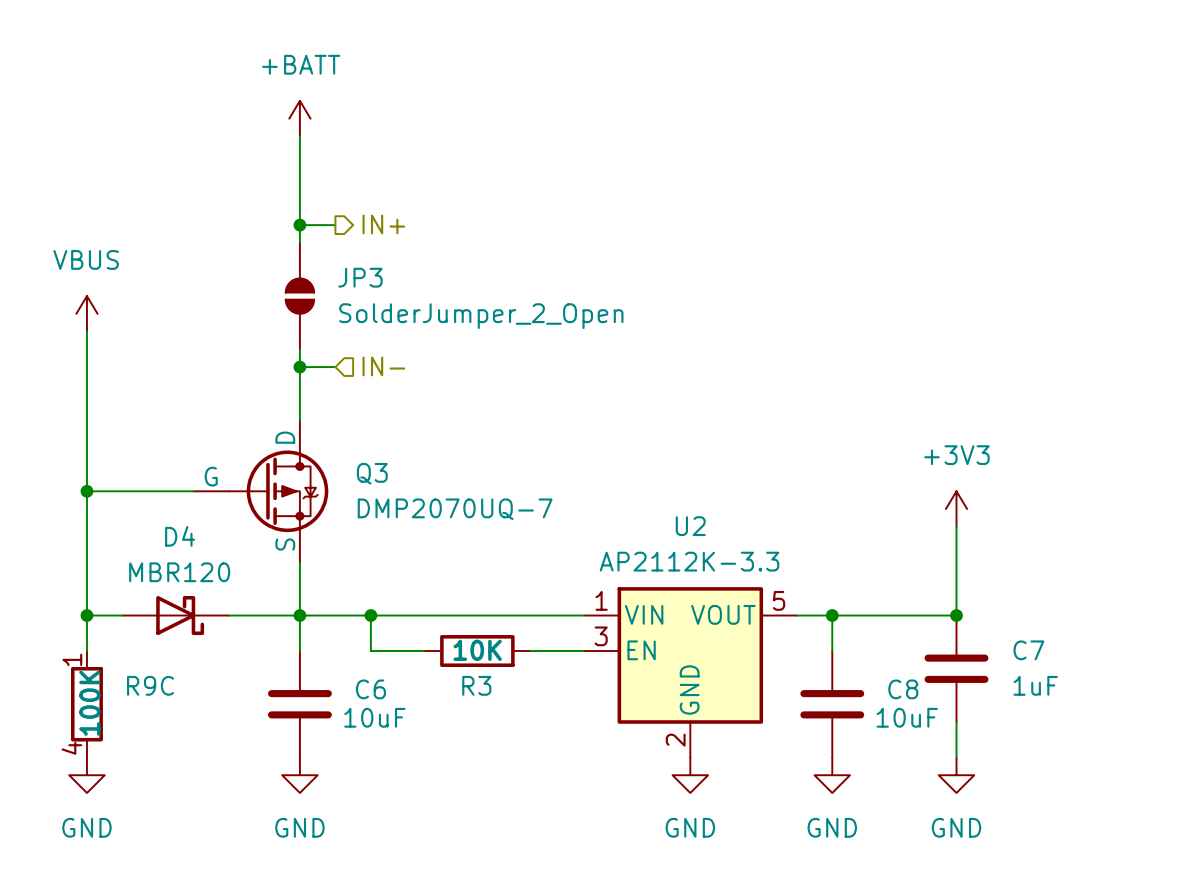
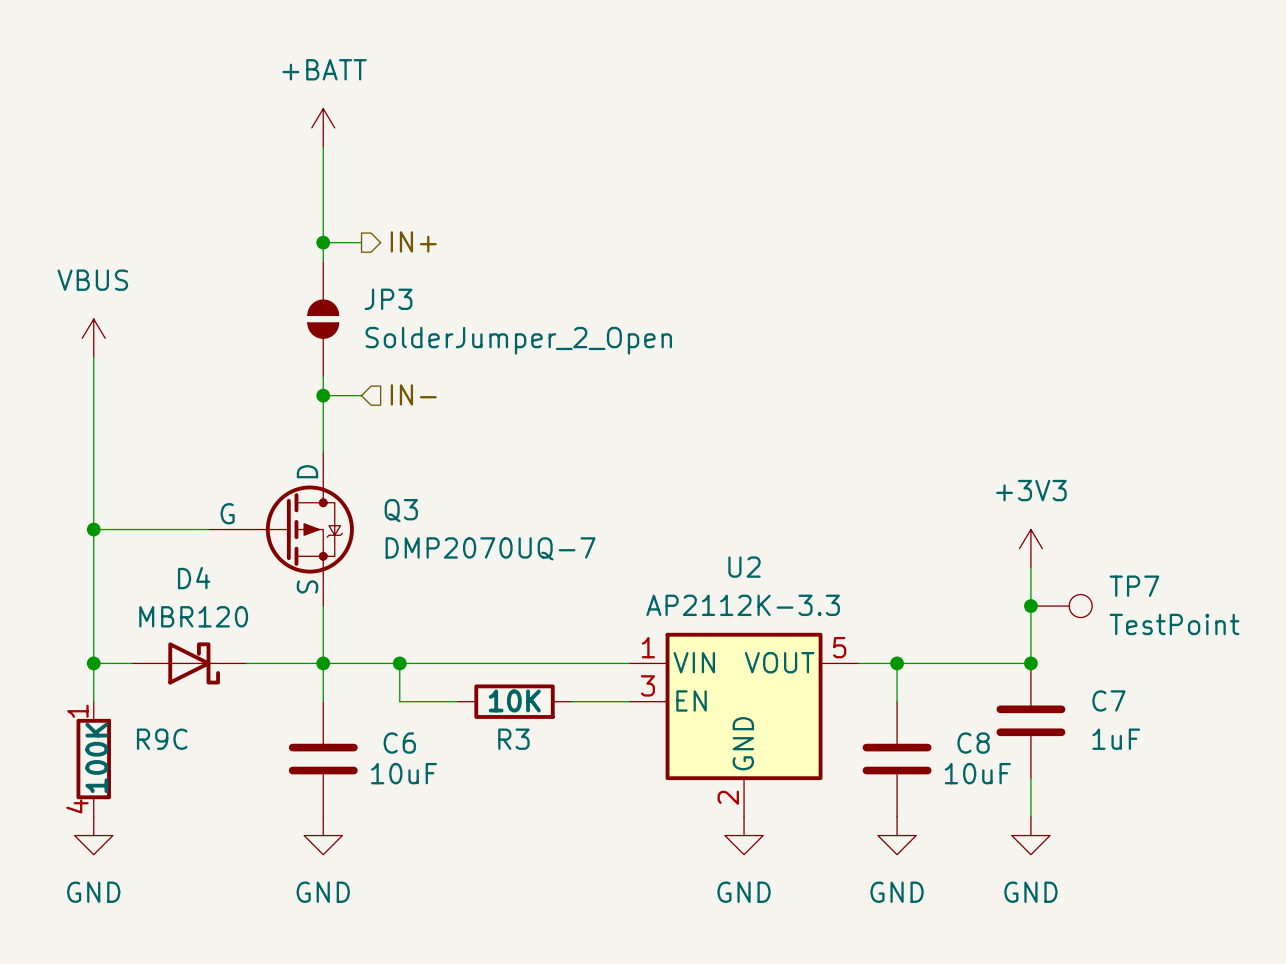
junction: none -> (1030, 606)
TP7: none -> TestPoint (1061, 606)

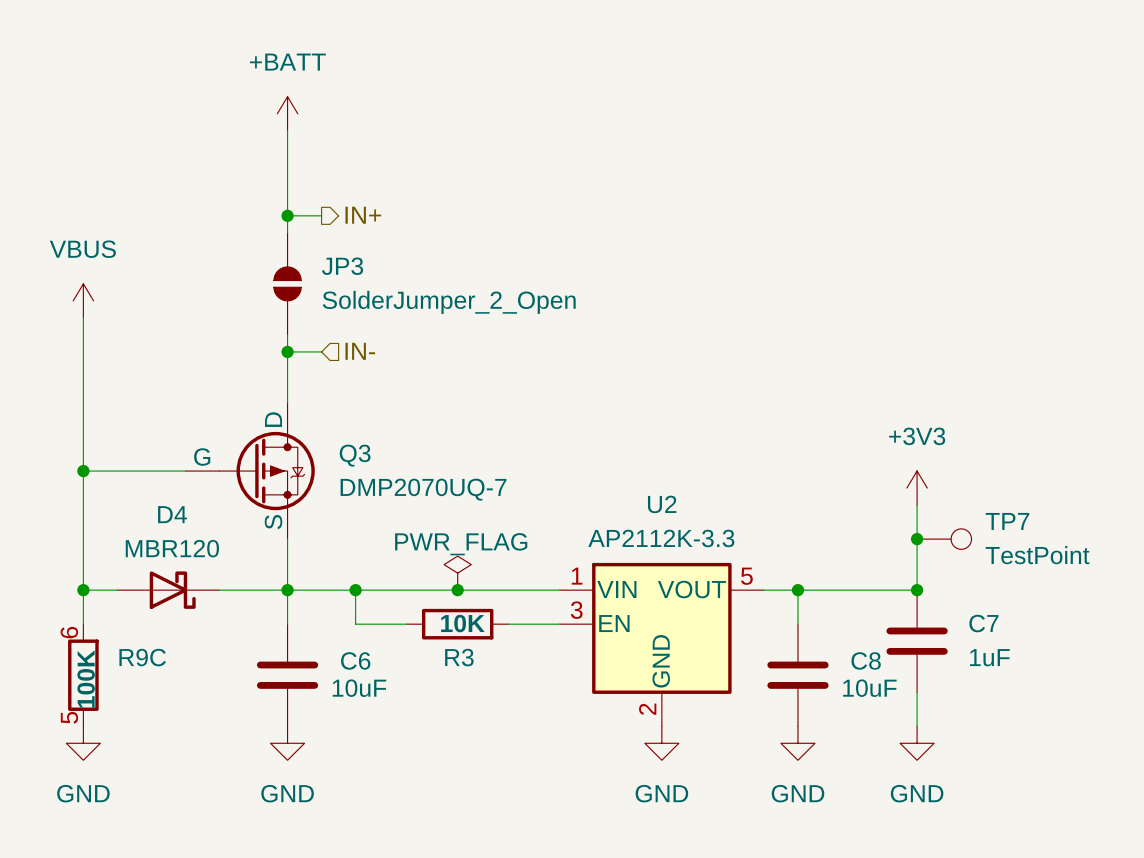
power symbol: none -> PWR_FLAG (457, 573)
junction: none -> (457, 590)
R9C pin number: 1 (77, 711) -> 6 (69, 632)
R9C pin number: 4 (77, 806) -> 5 (69, 717)

